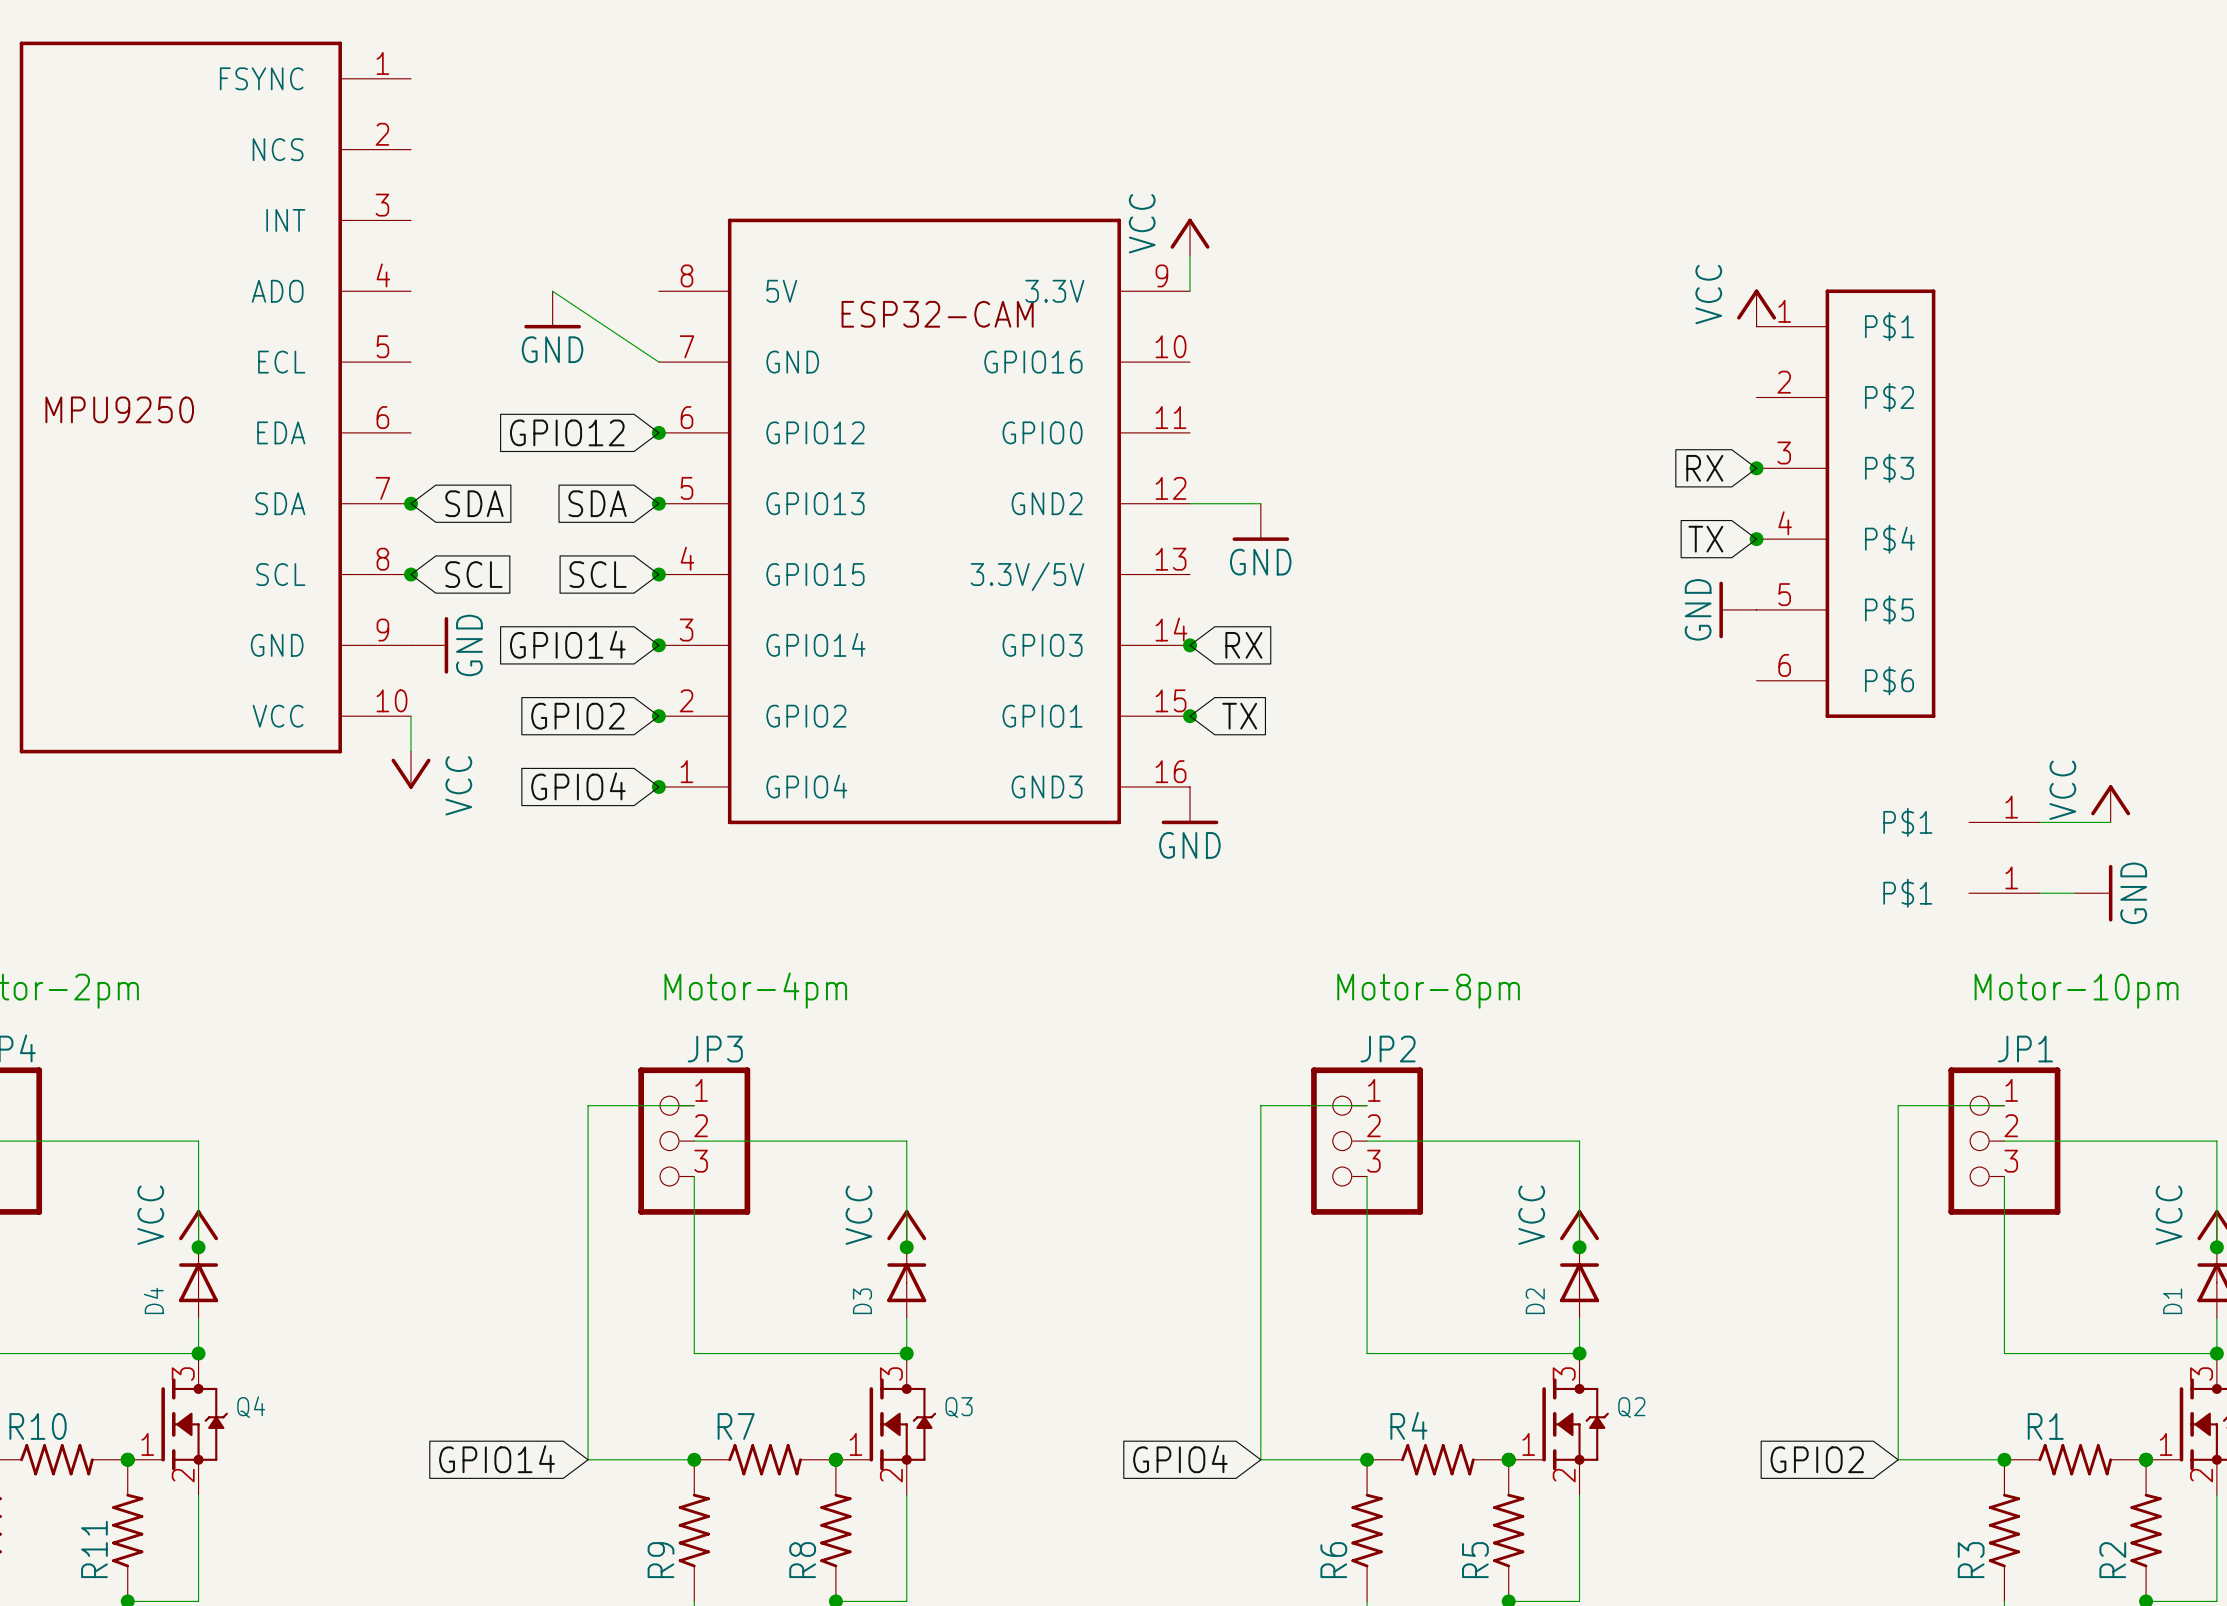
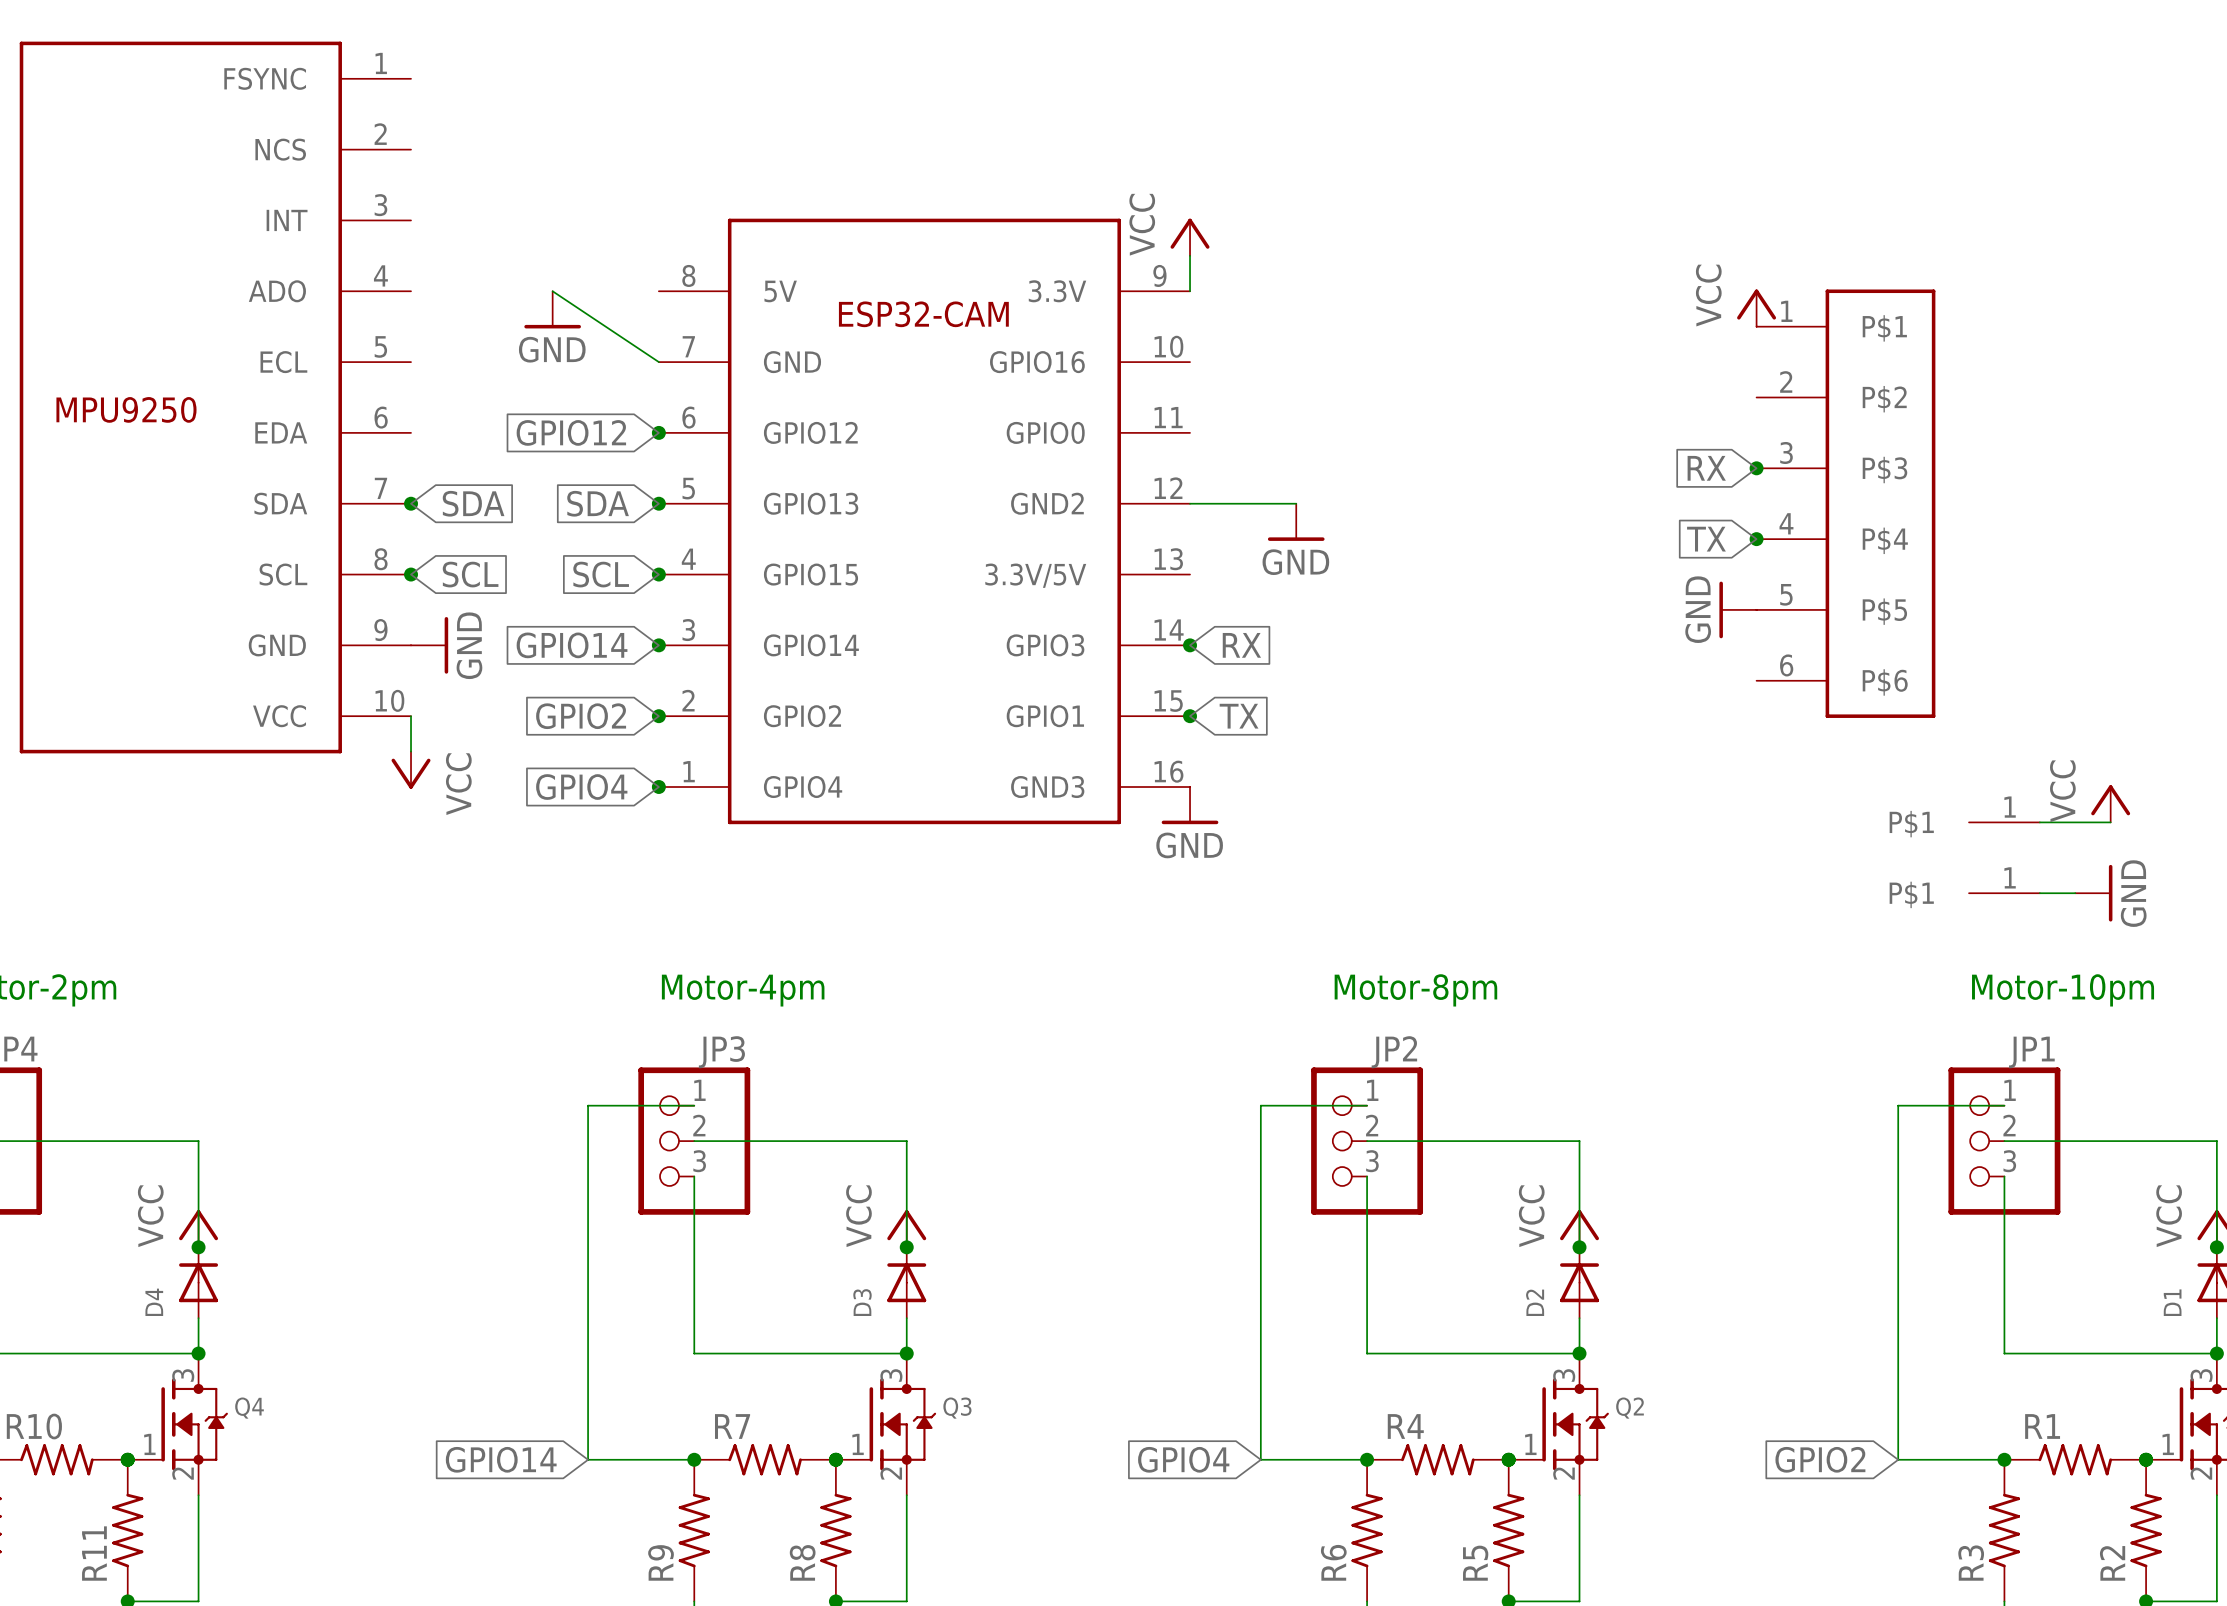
wire: none -> (1260, 503) (1296, 503)
power symbol position: GND (1260, 522) -> GND (1296, 522)

